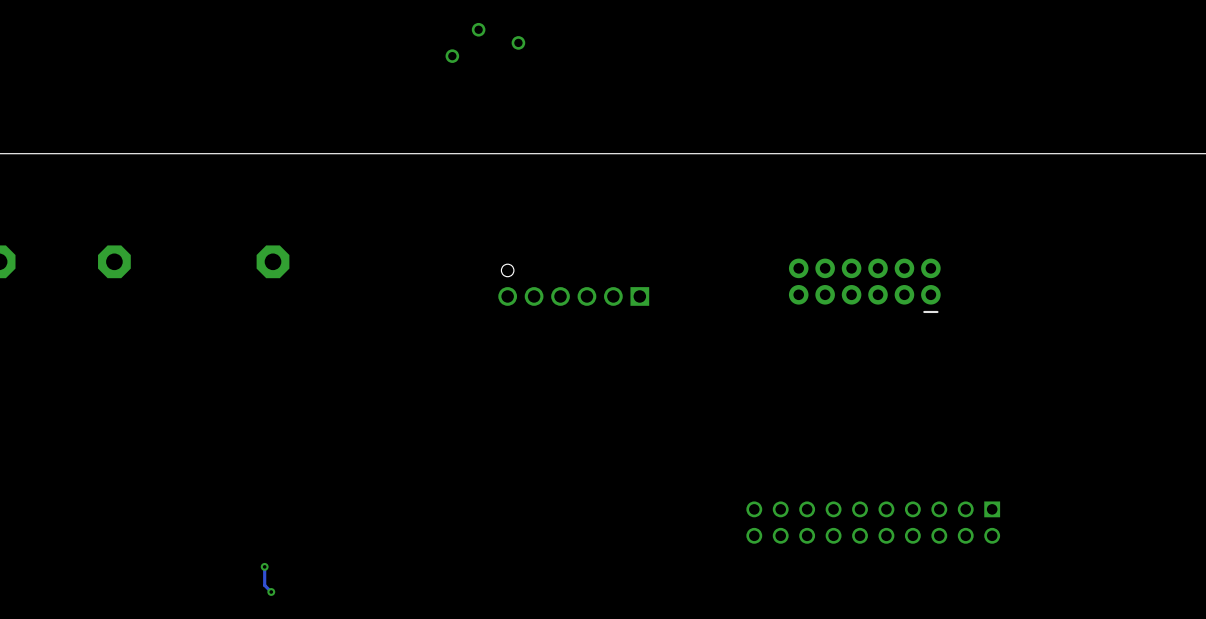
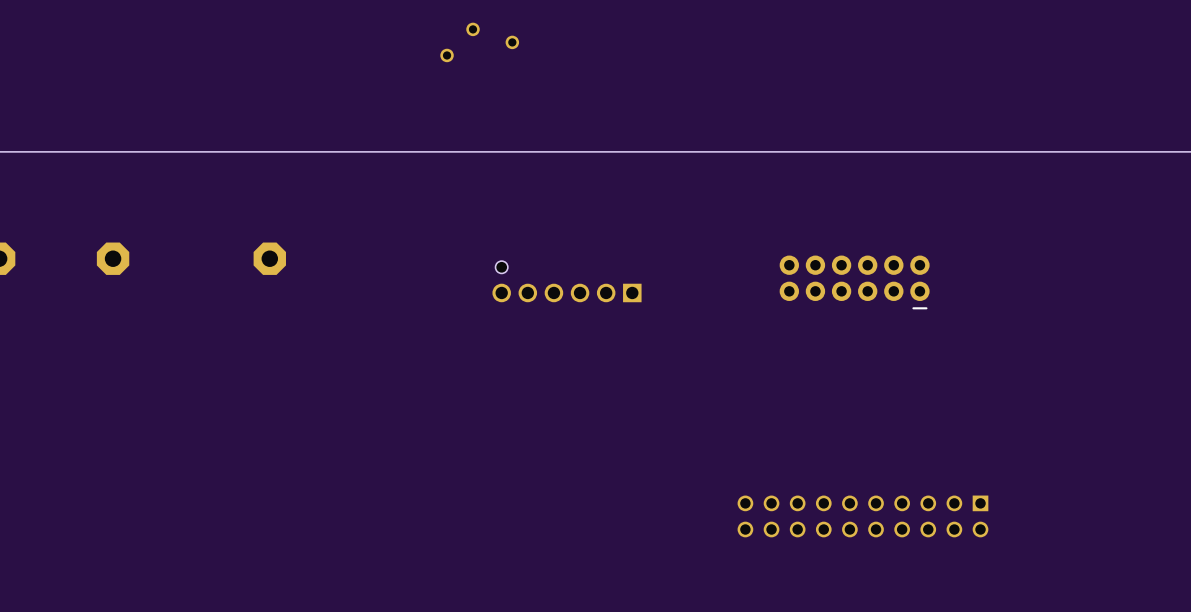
track: (264, 566) (264, 585) (271, 591) -> none
via: (264, 566) -> none
via: (271, 591) -> none

